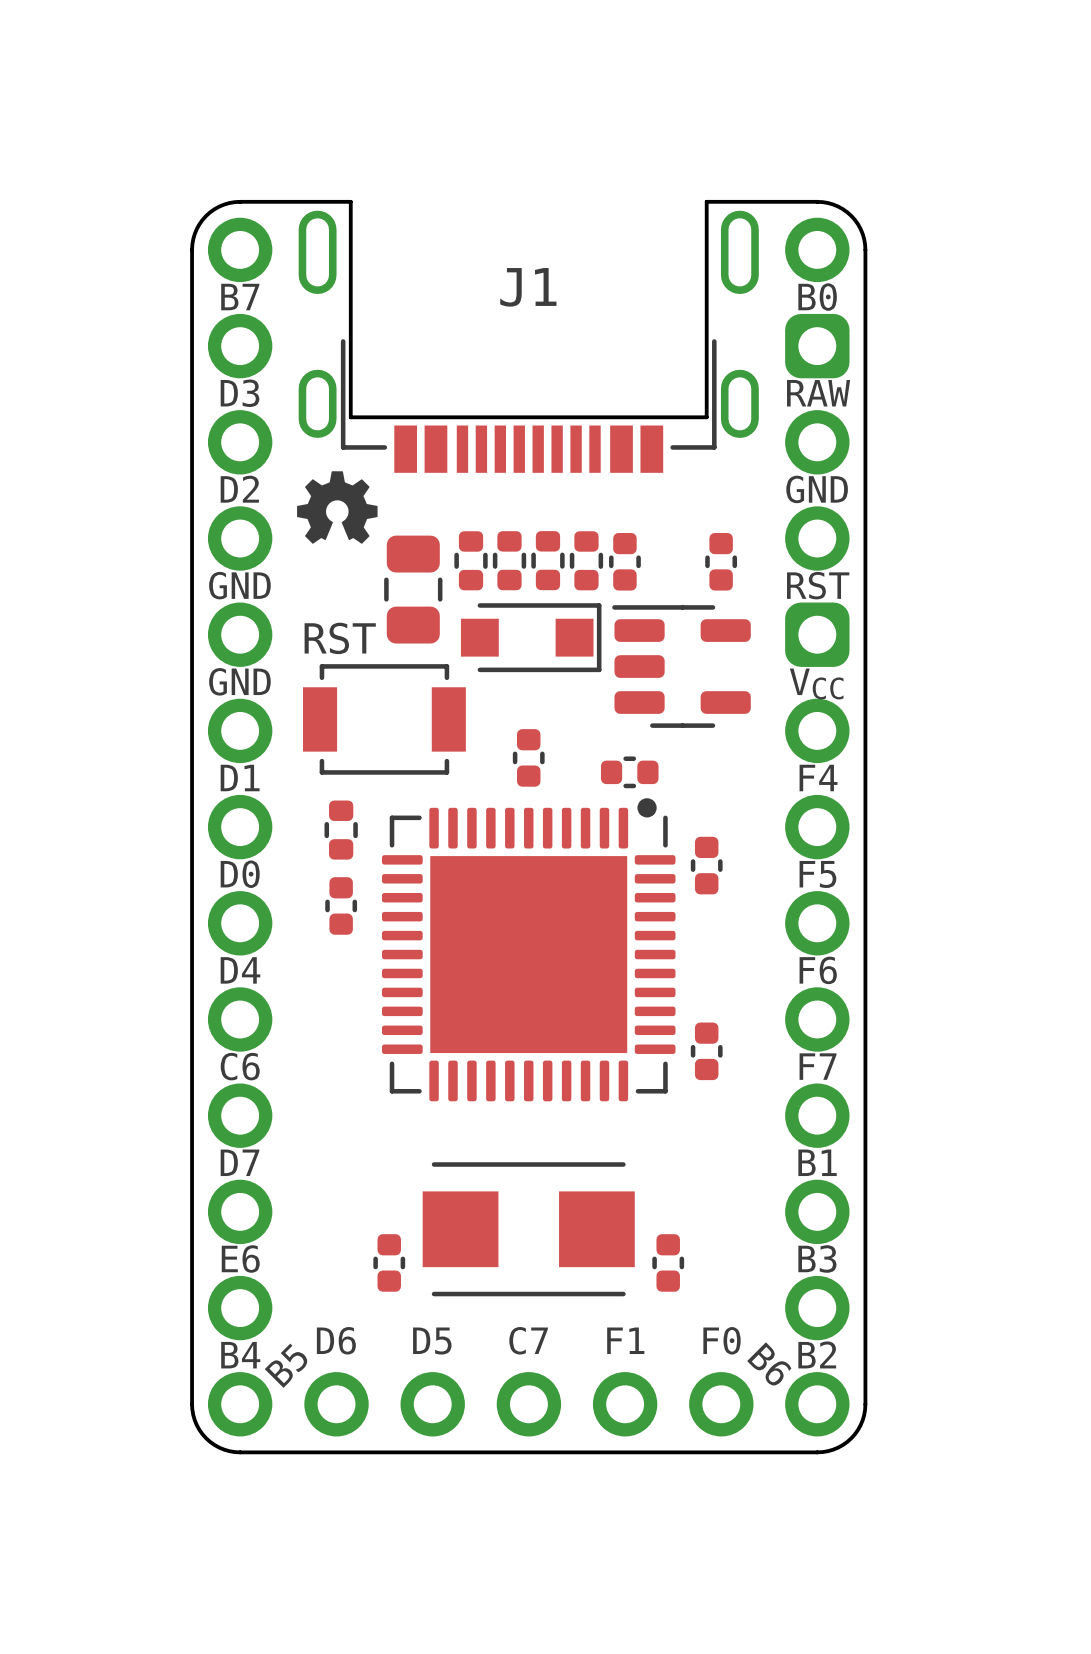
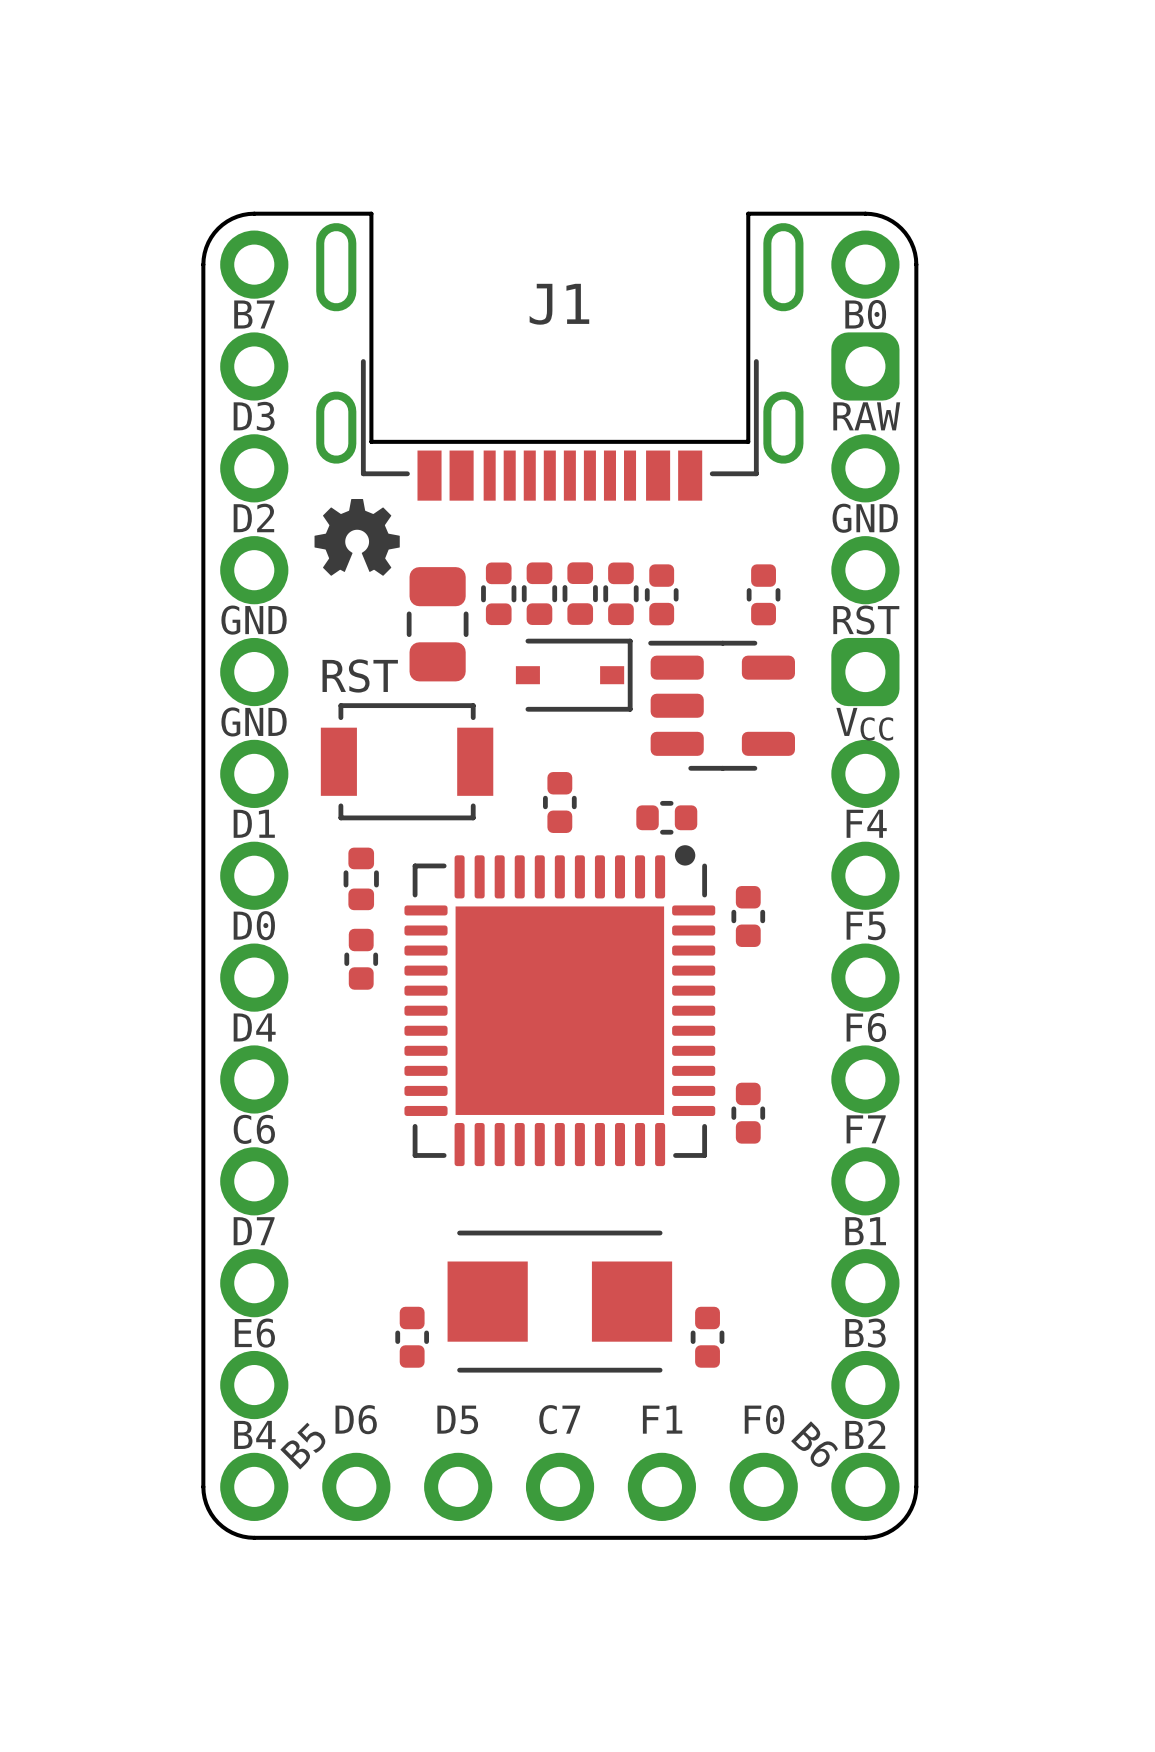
part footprint: [460, 603, 602, 673] -> [515, 638, 633, 712]

